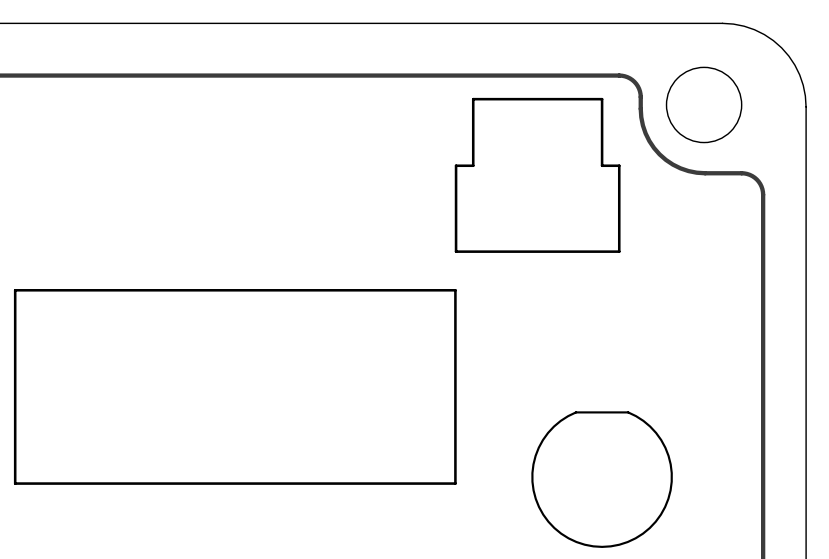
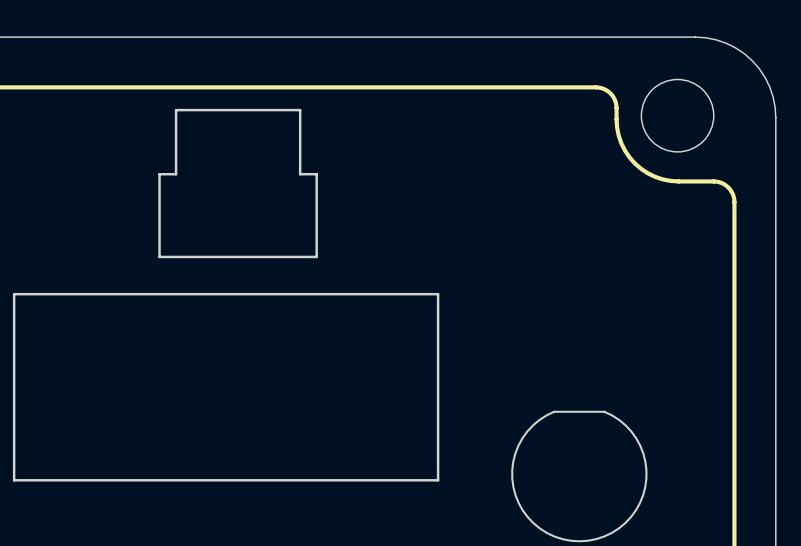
drawing position: (537, 175) -> (238, 183)

